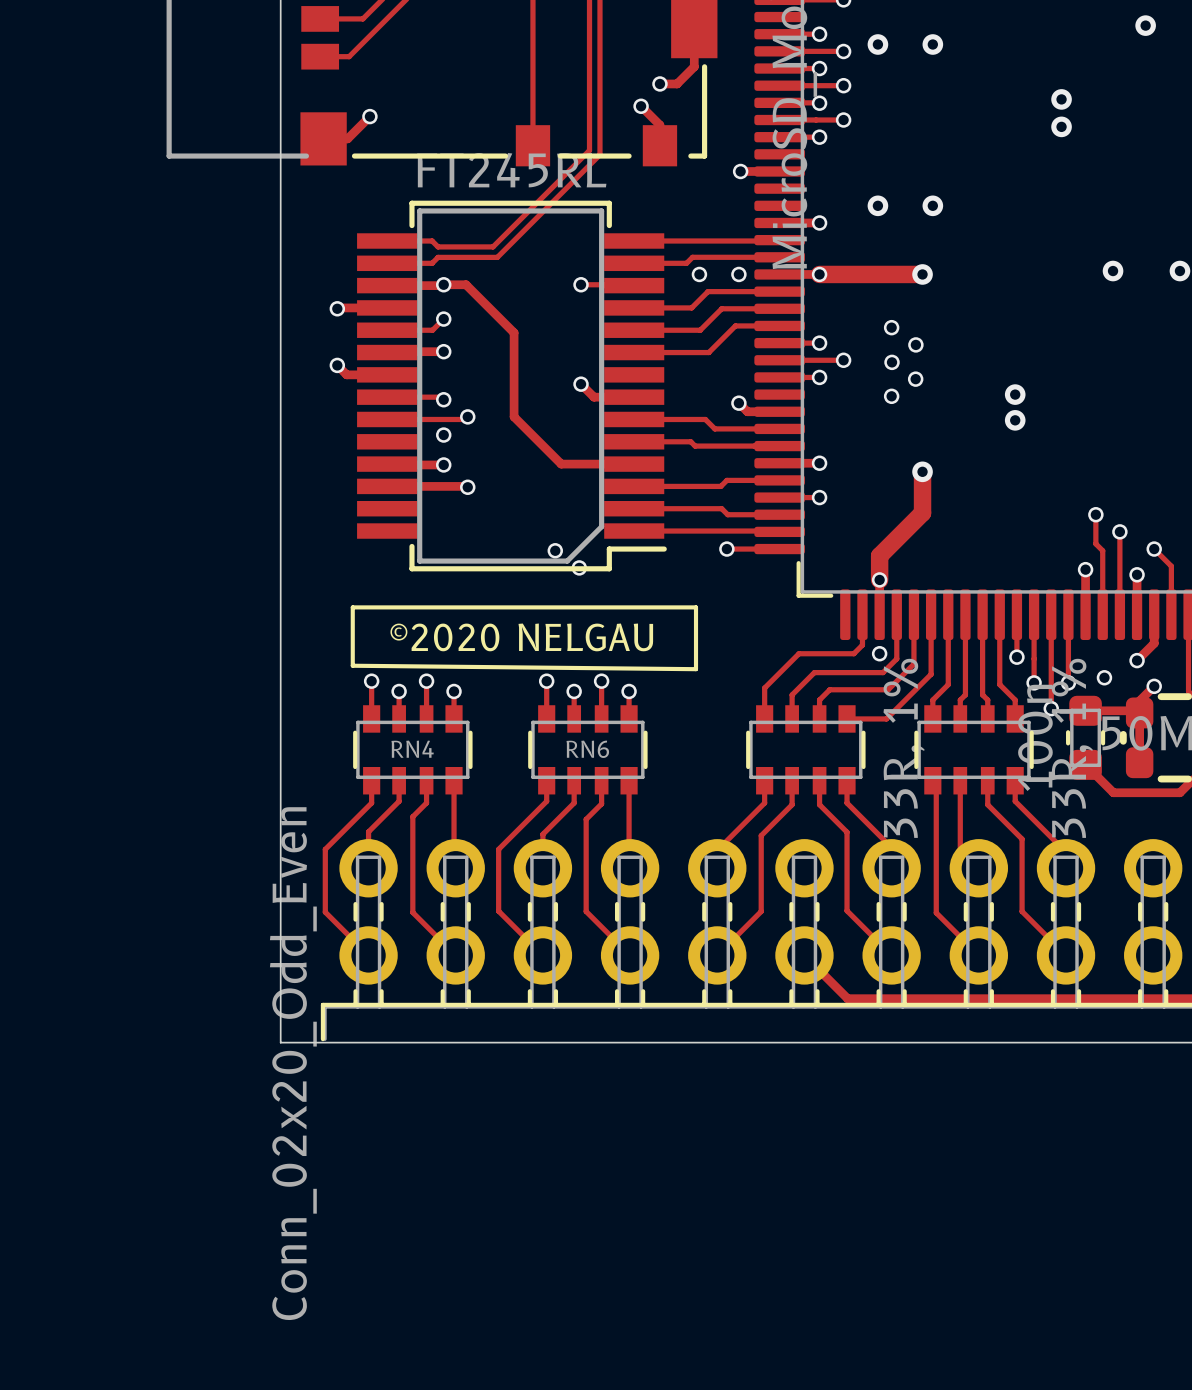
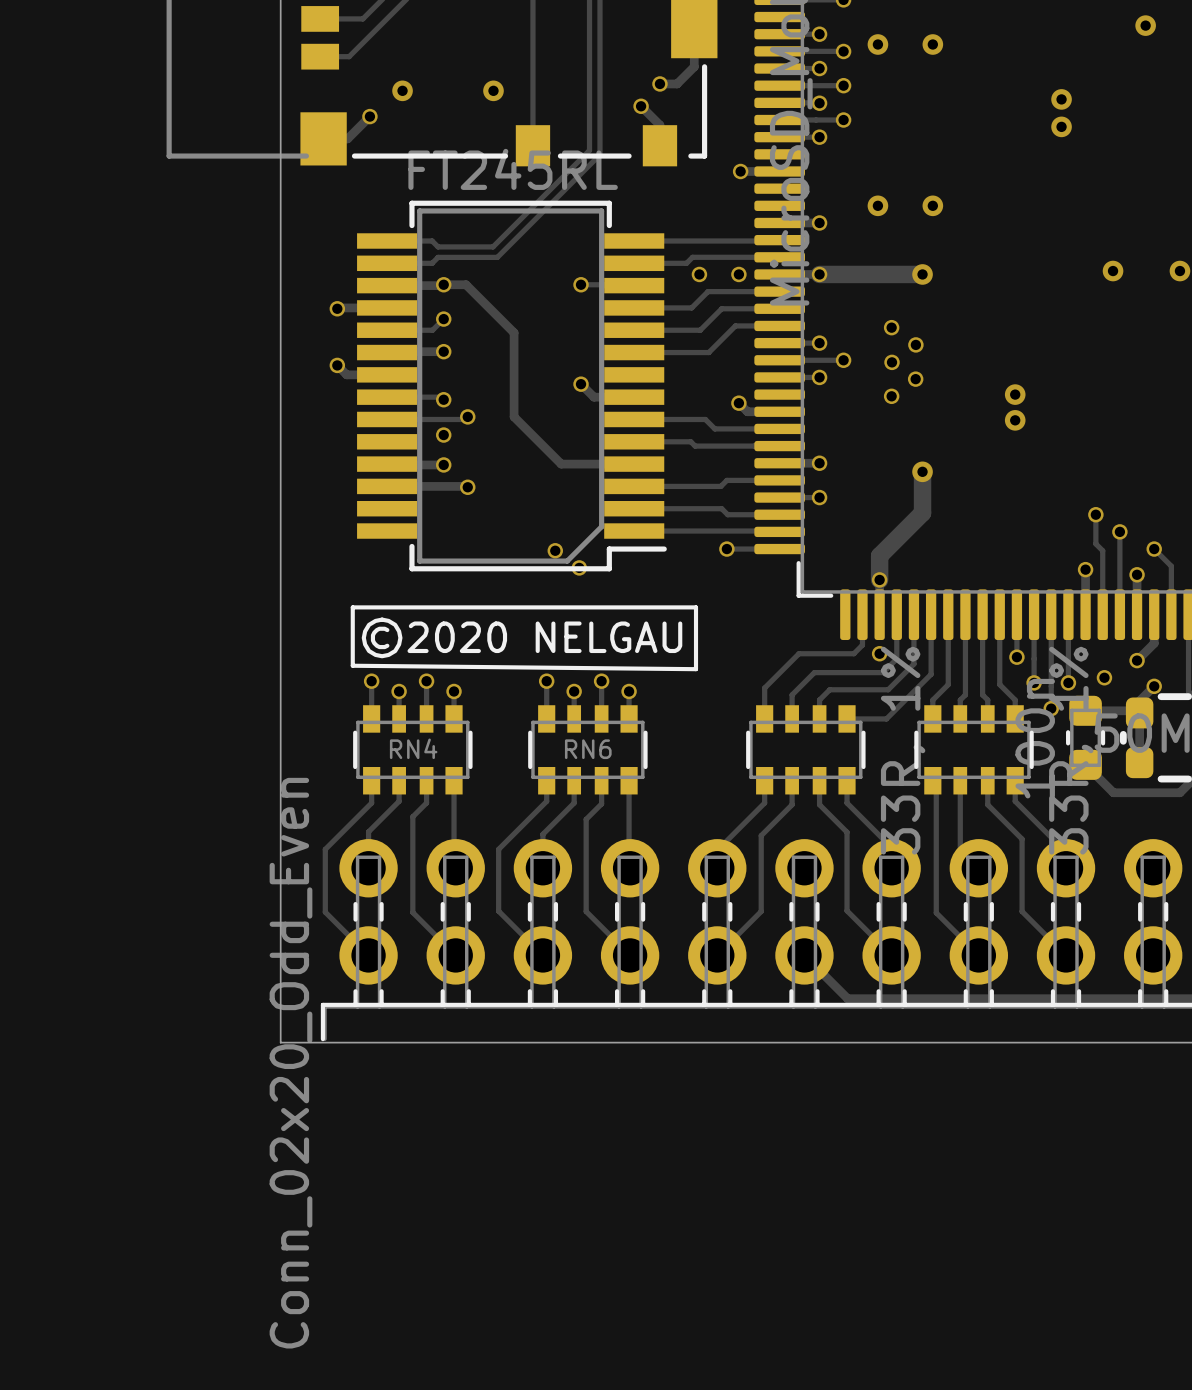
via: none -> (402, 90)
via: none -> (493, 90)

